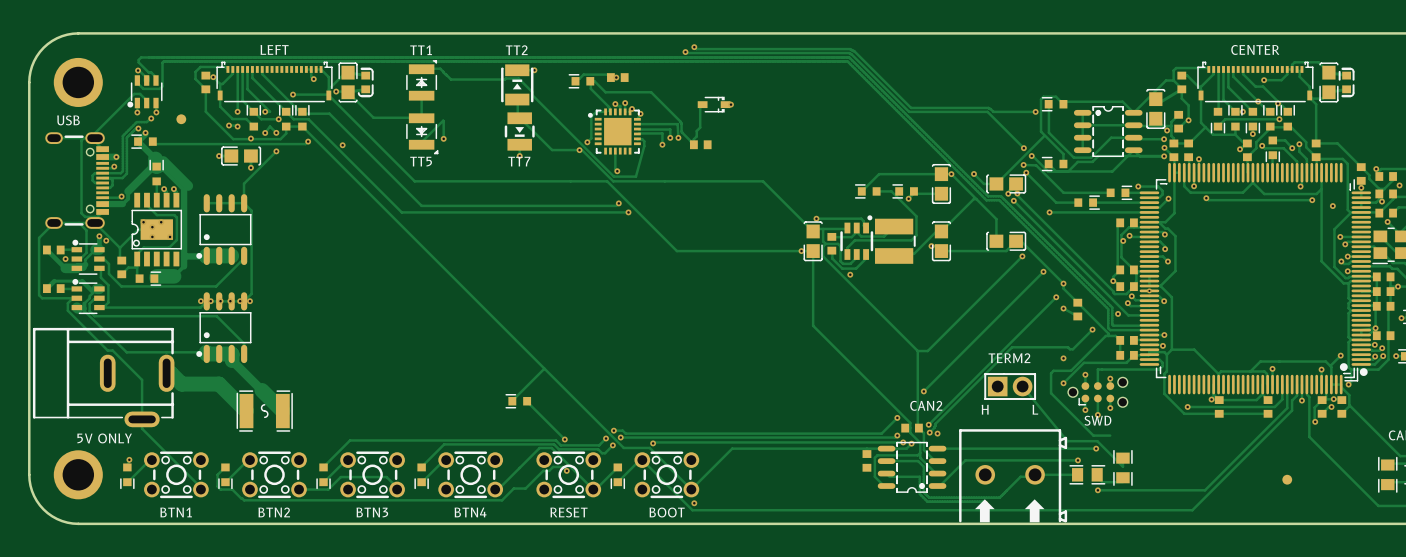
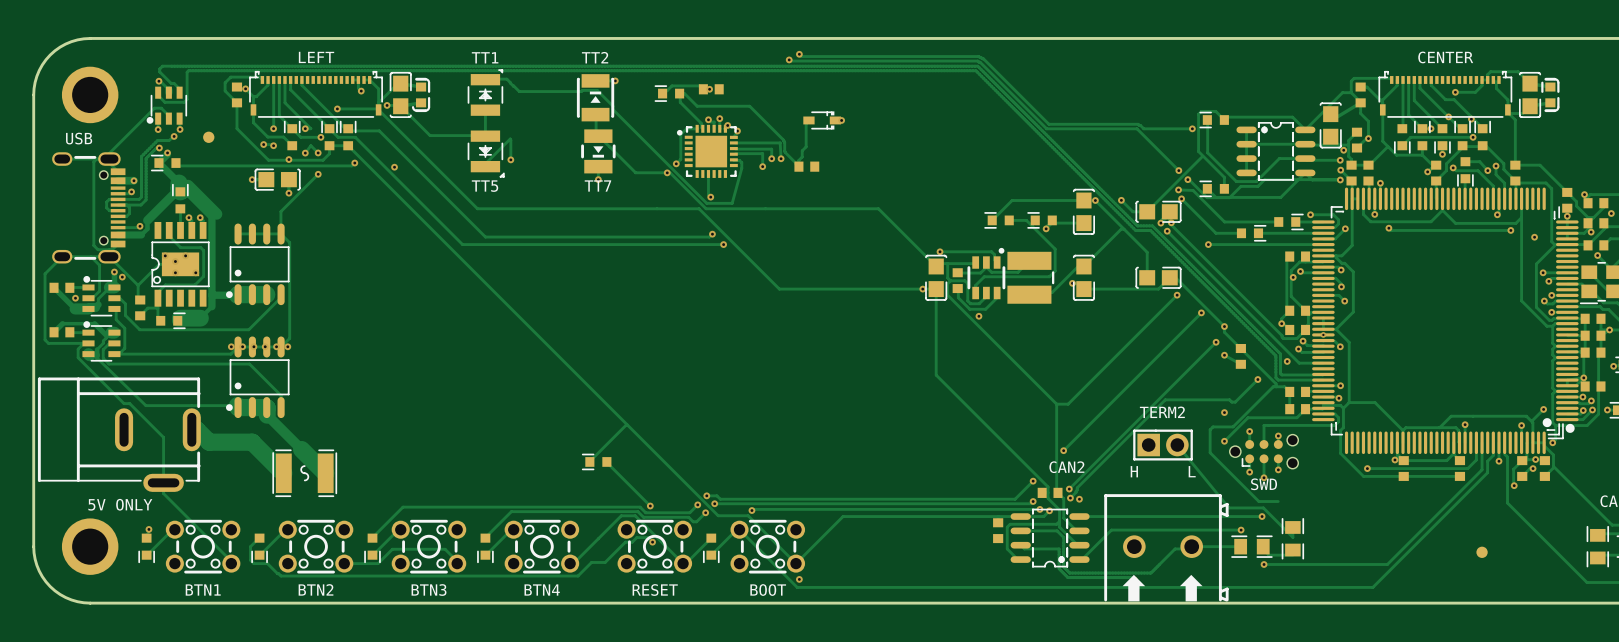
part footprint: [45, 132, 109, 229] -> [52, 152, 126, 264]

